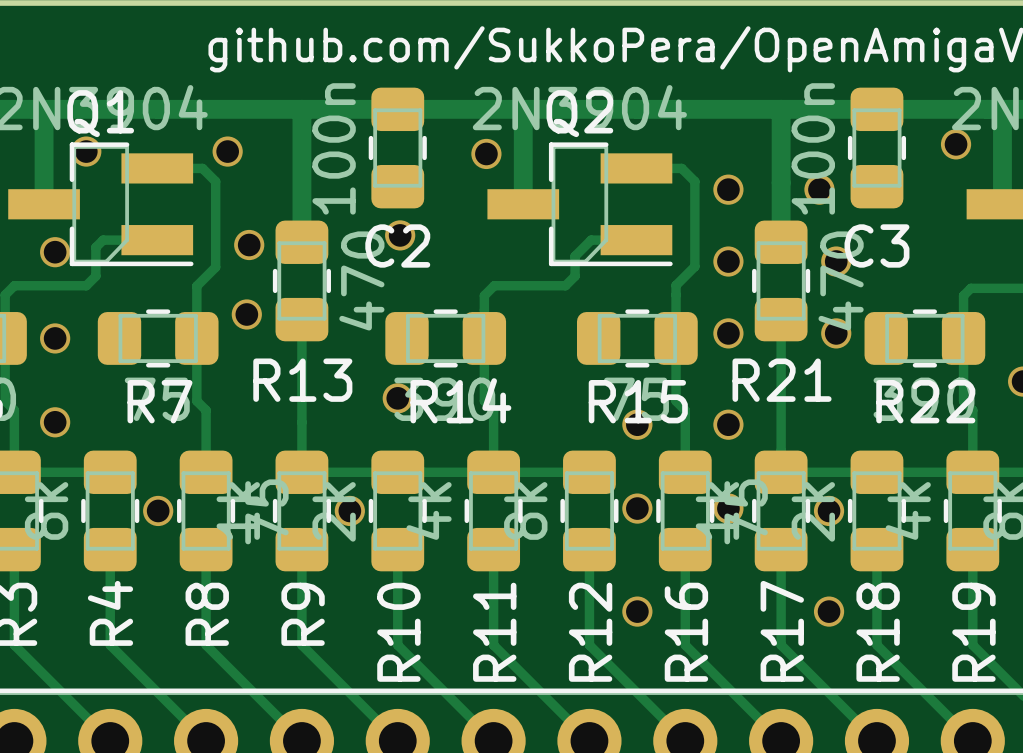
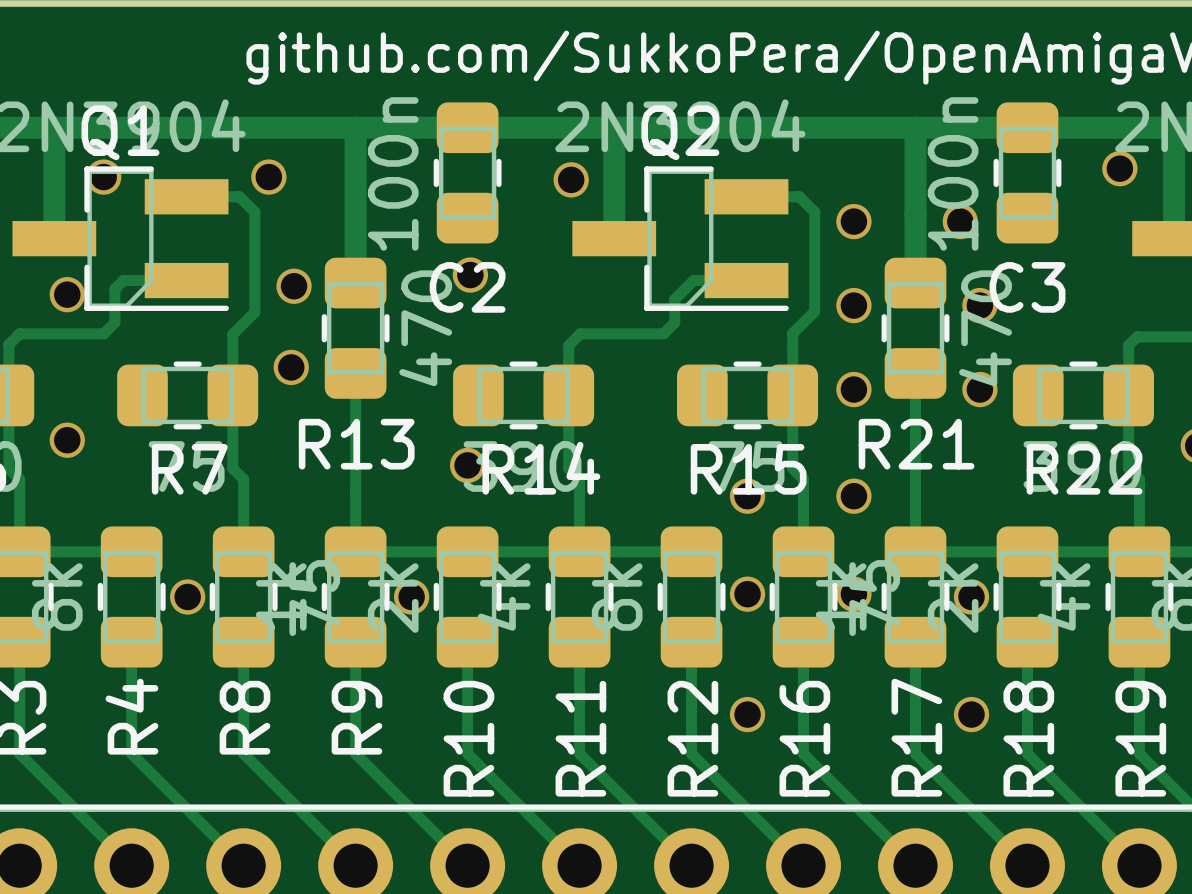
via: (55, 338) -> none
via: none -> (67, 440)
via: (55, 422) -> none

